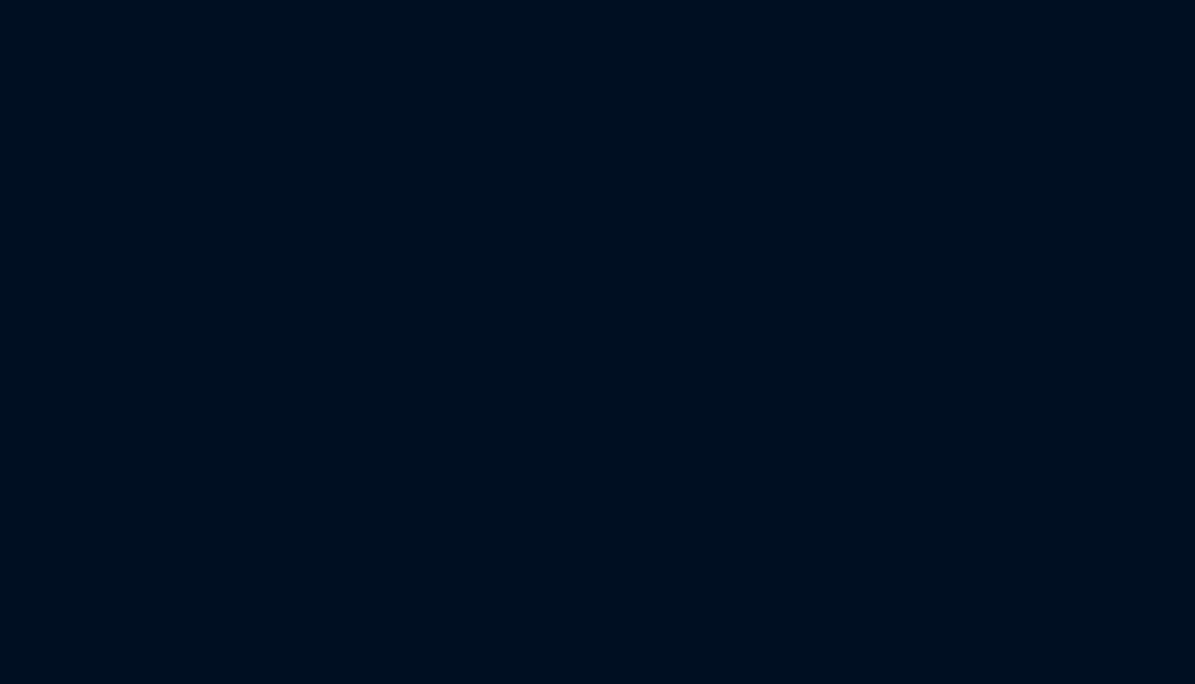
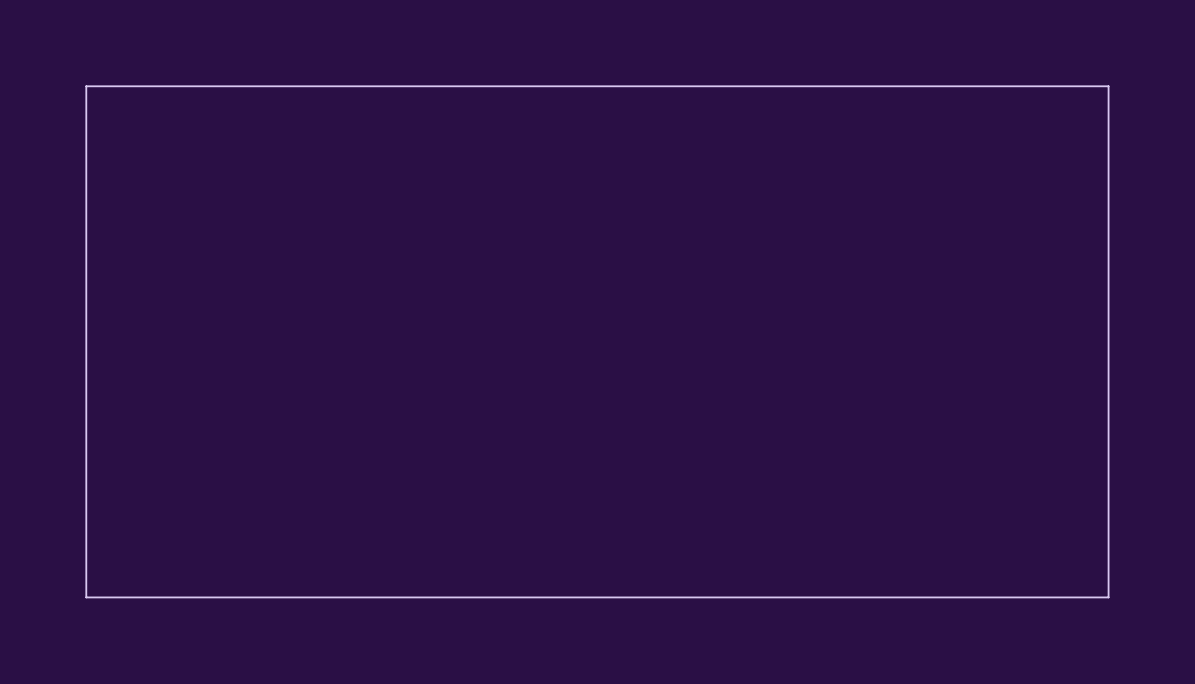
board edge: none -> (1108, 86) (86, 86) (86, 597) (1108, 597) (1108, 86)

